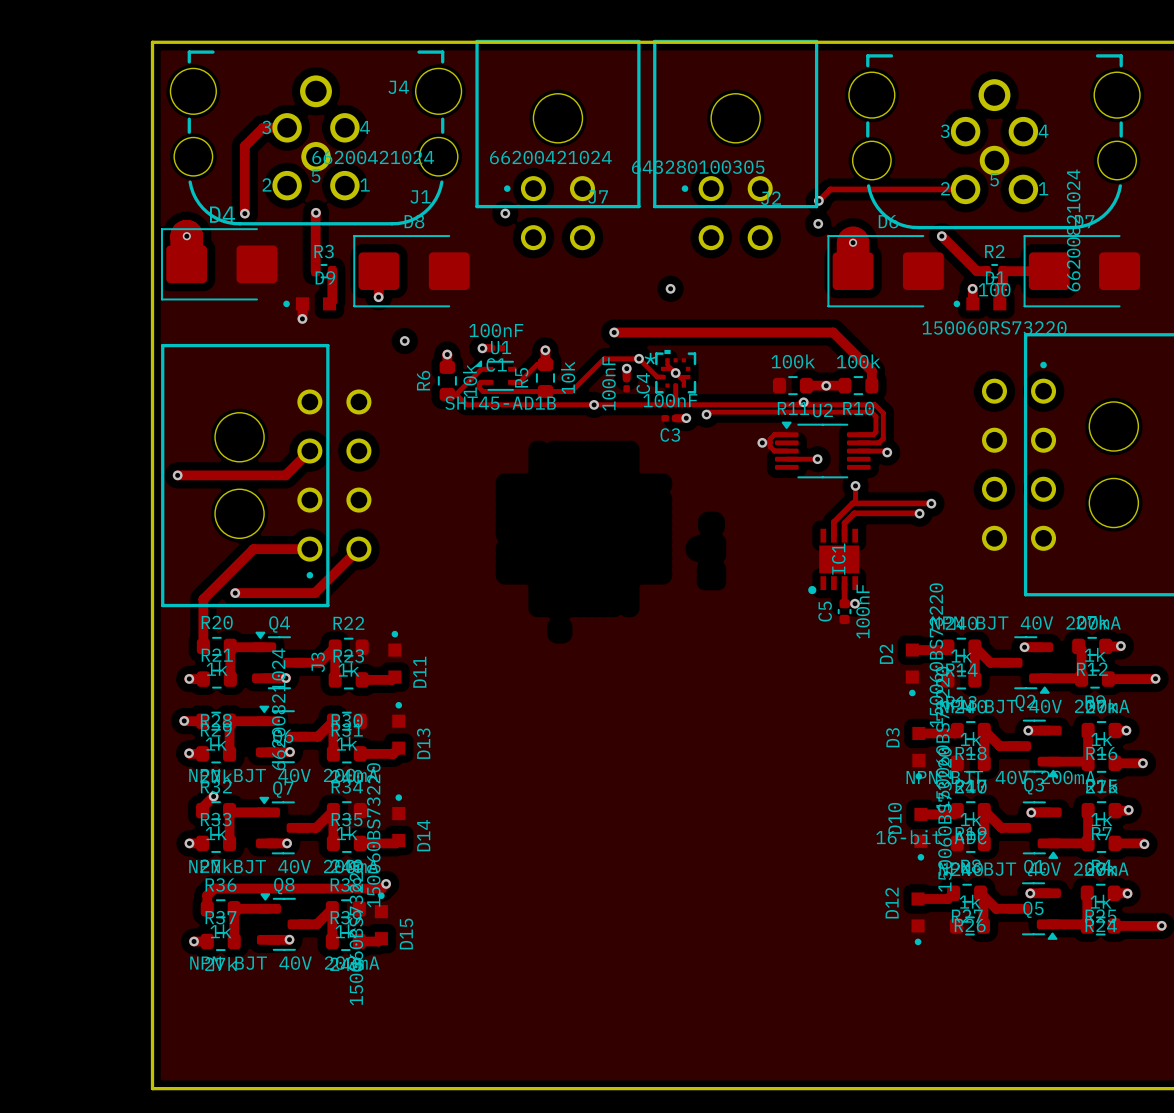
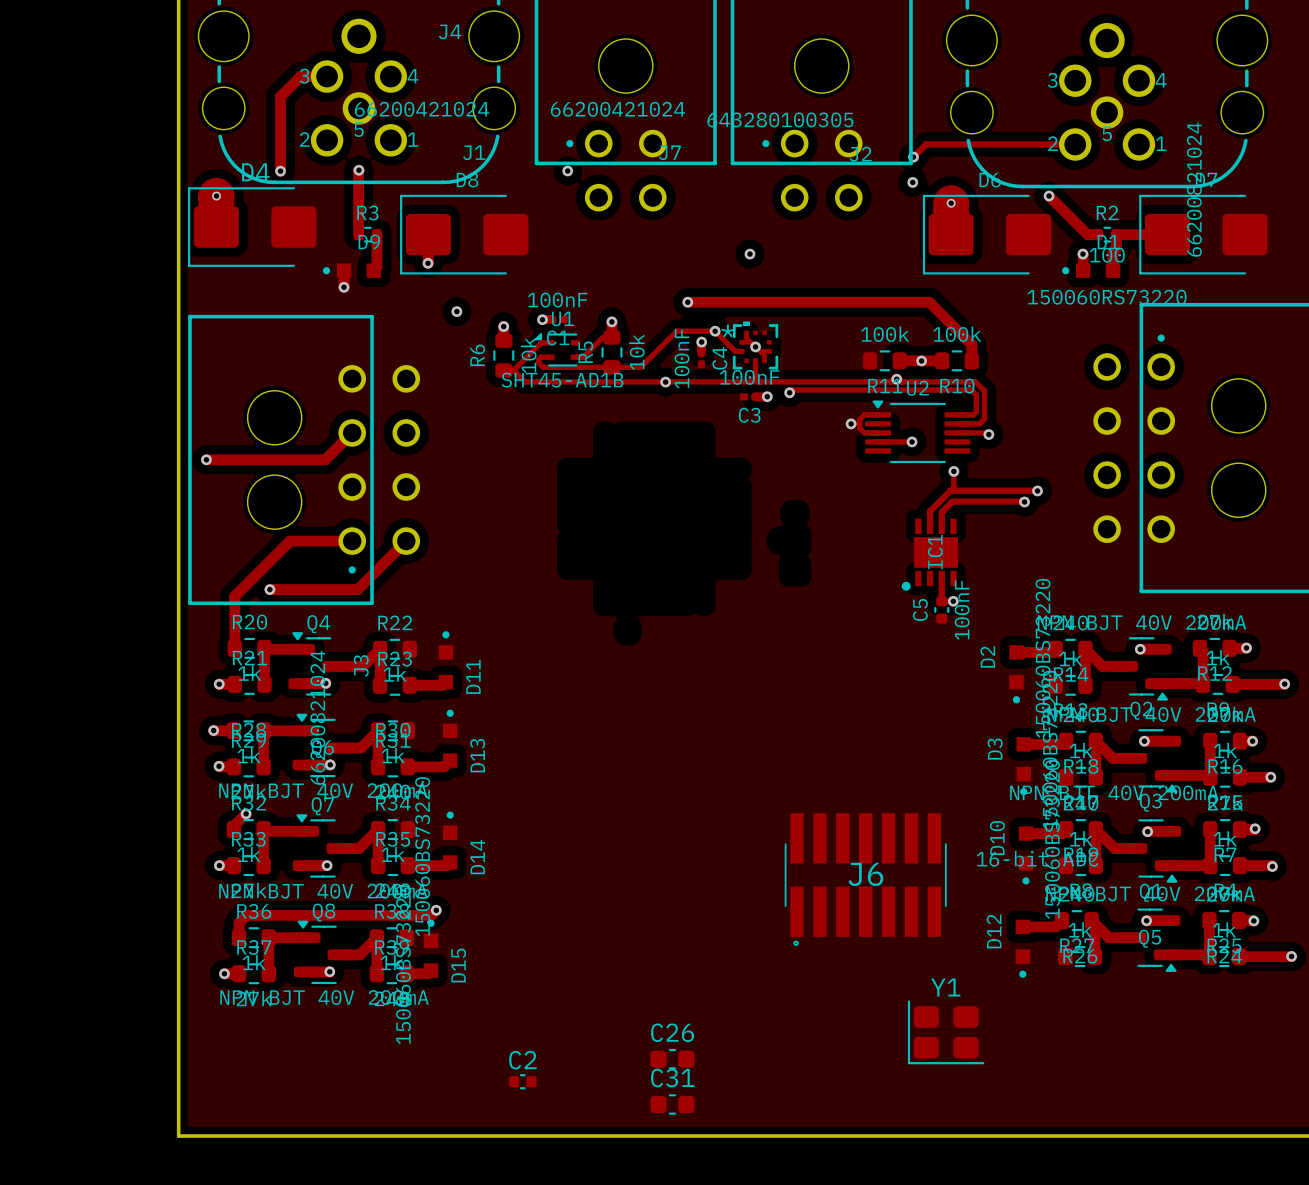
J6: none -> (865, 879)
Y1: none -> (946, 1032)
C26: none -> (672, 1059)
C2: none -> (522, 1081)
C31: none -> (672, 1104)

